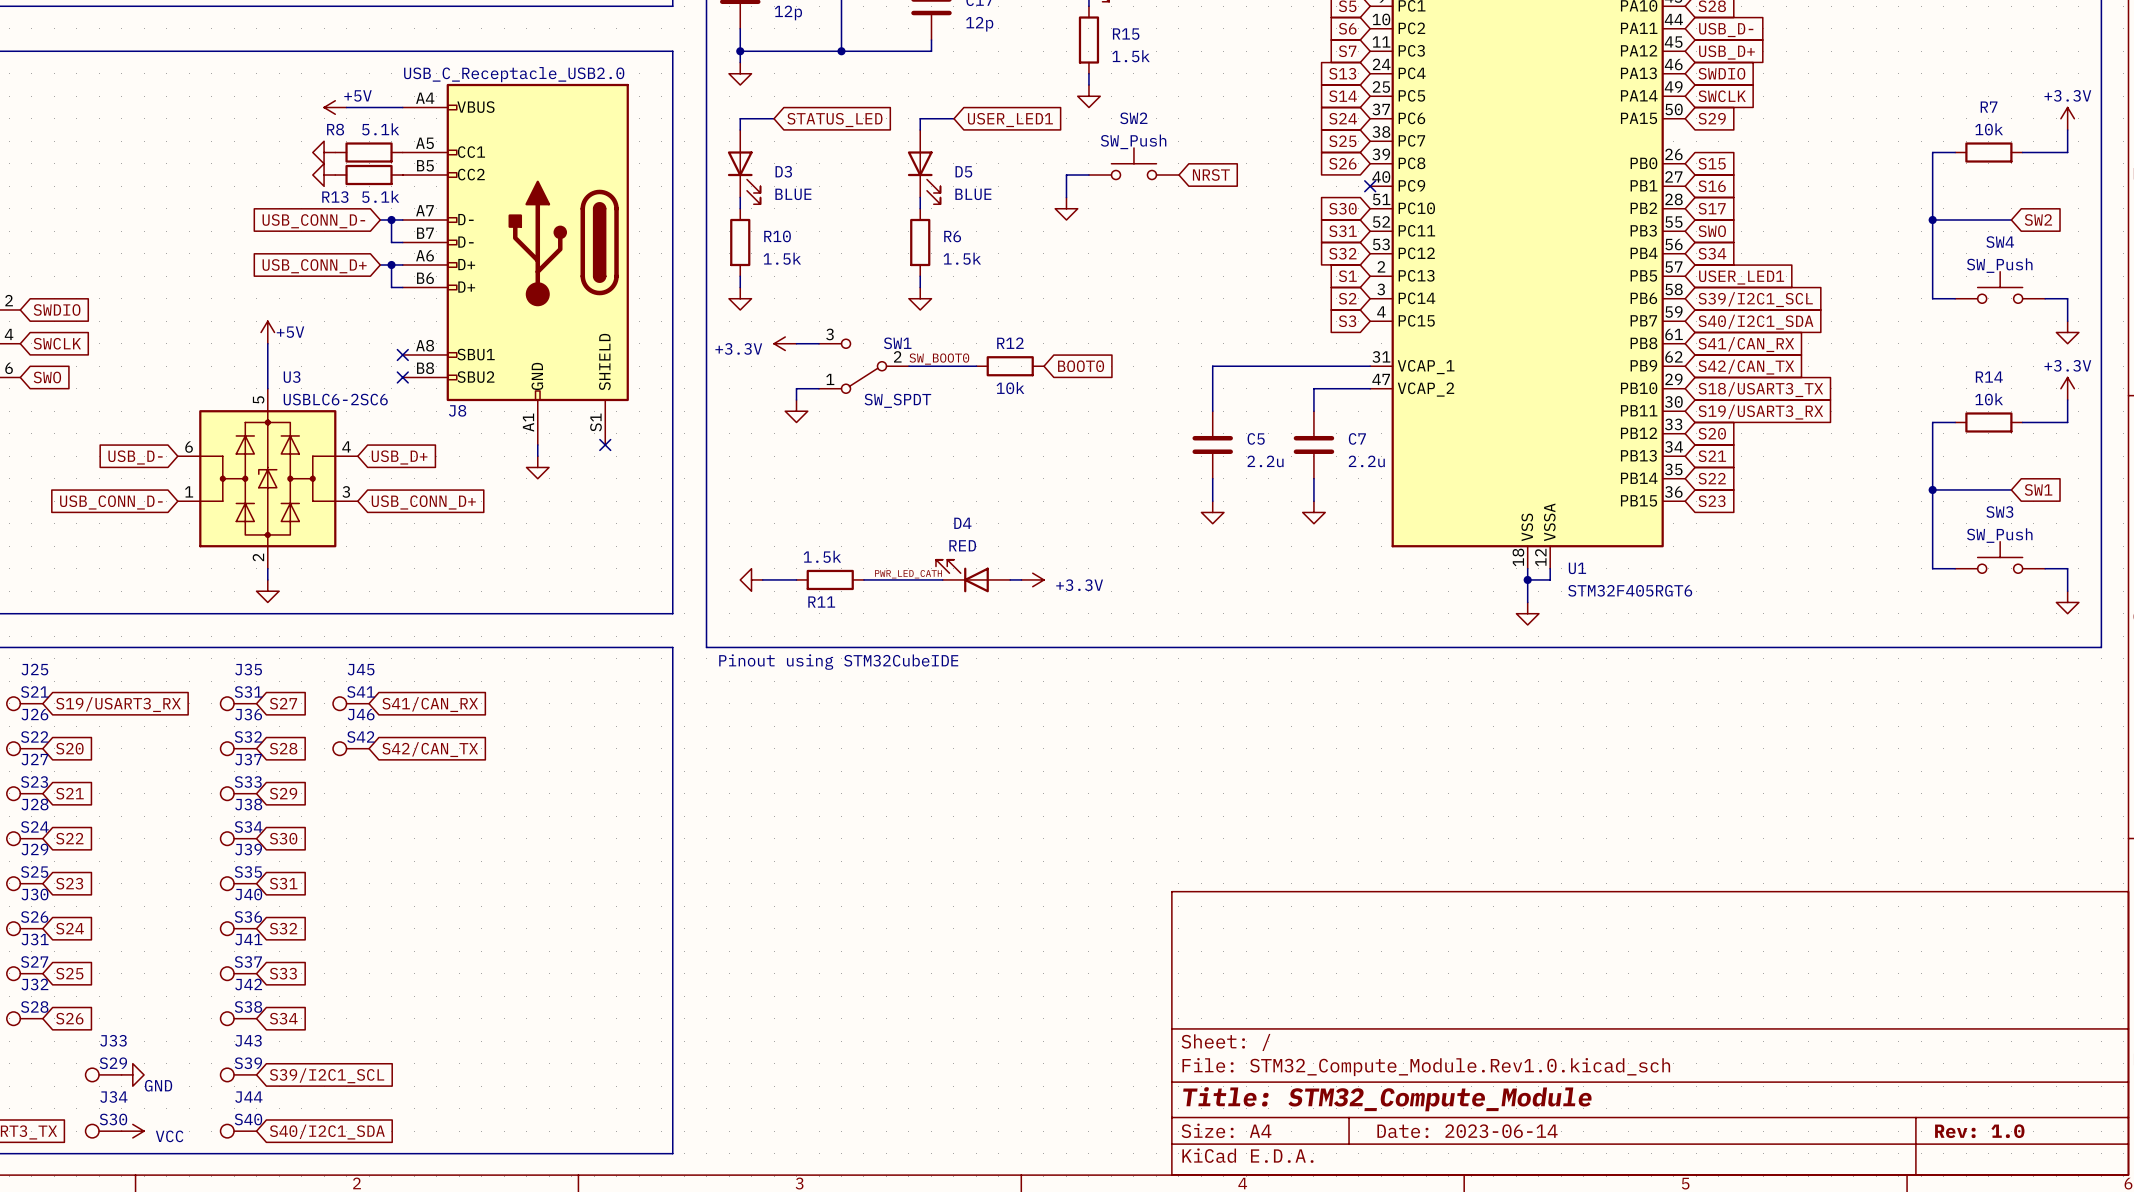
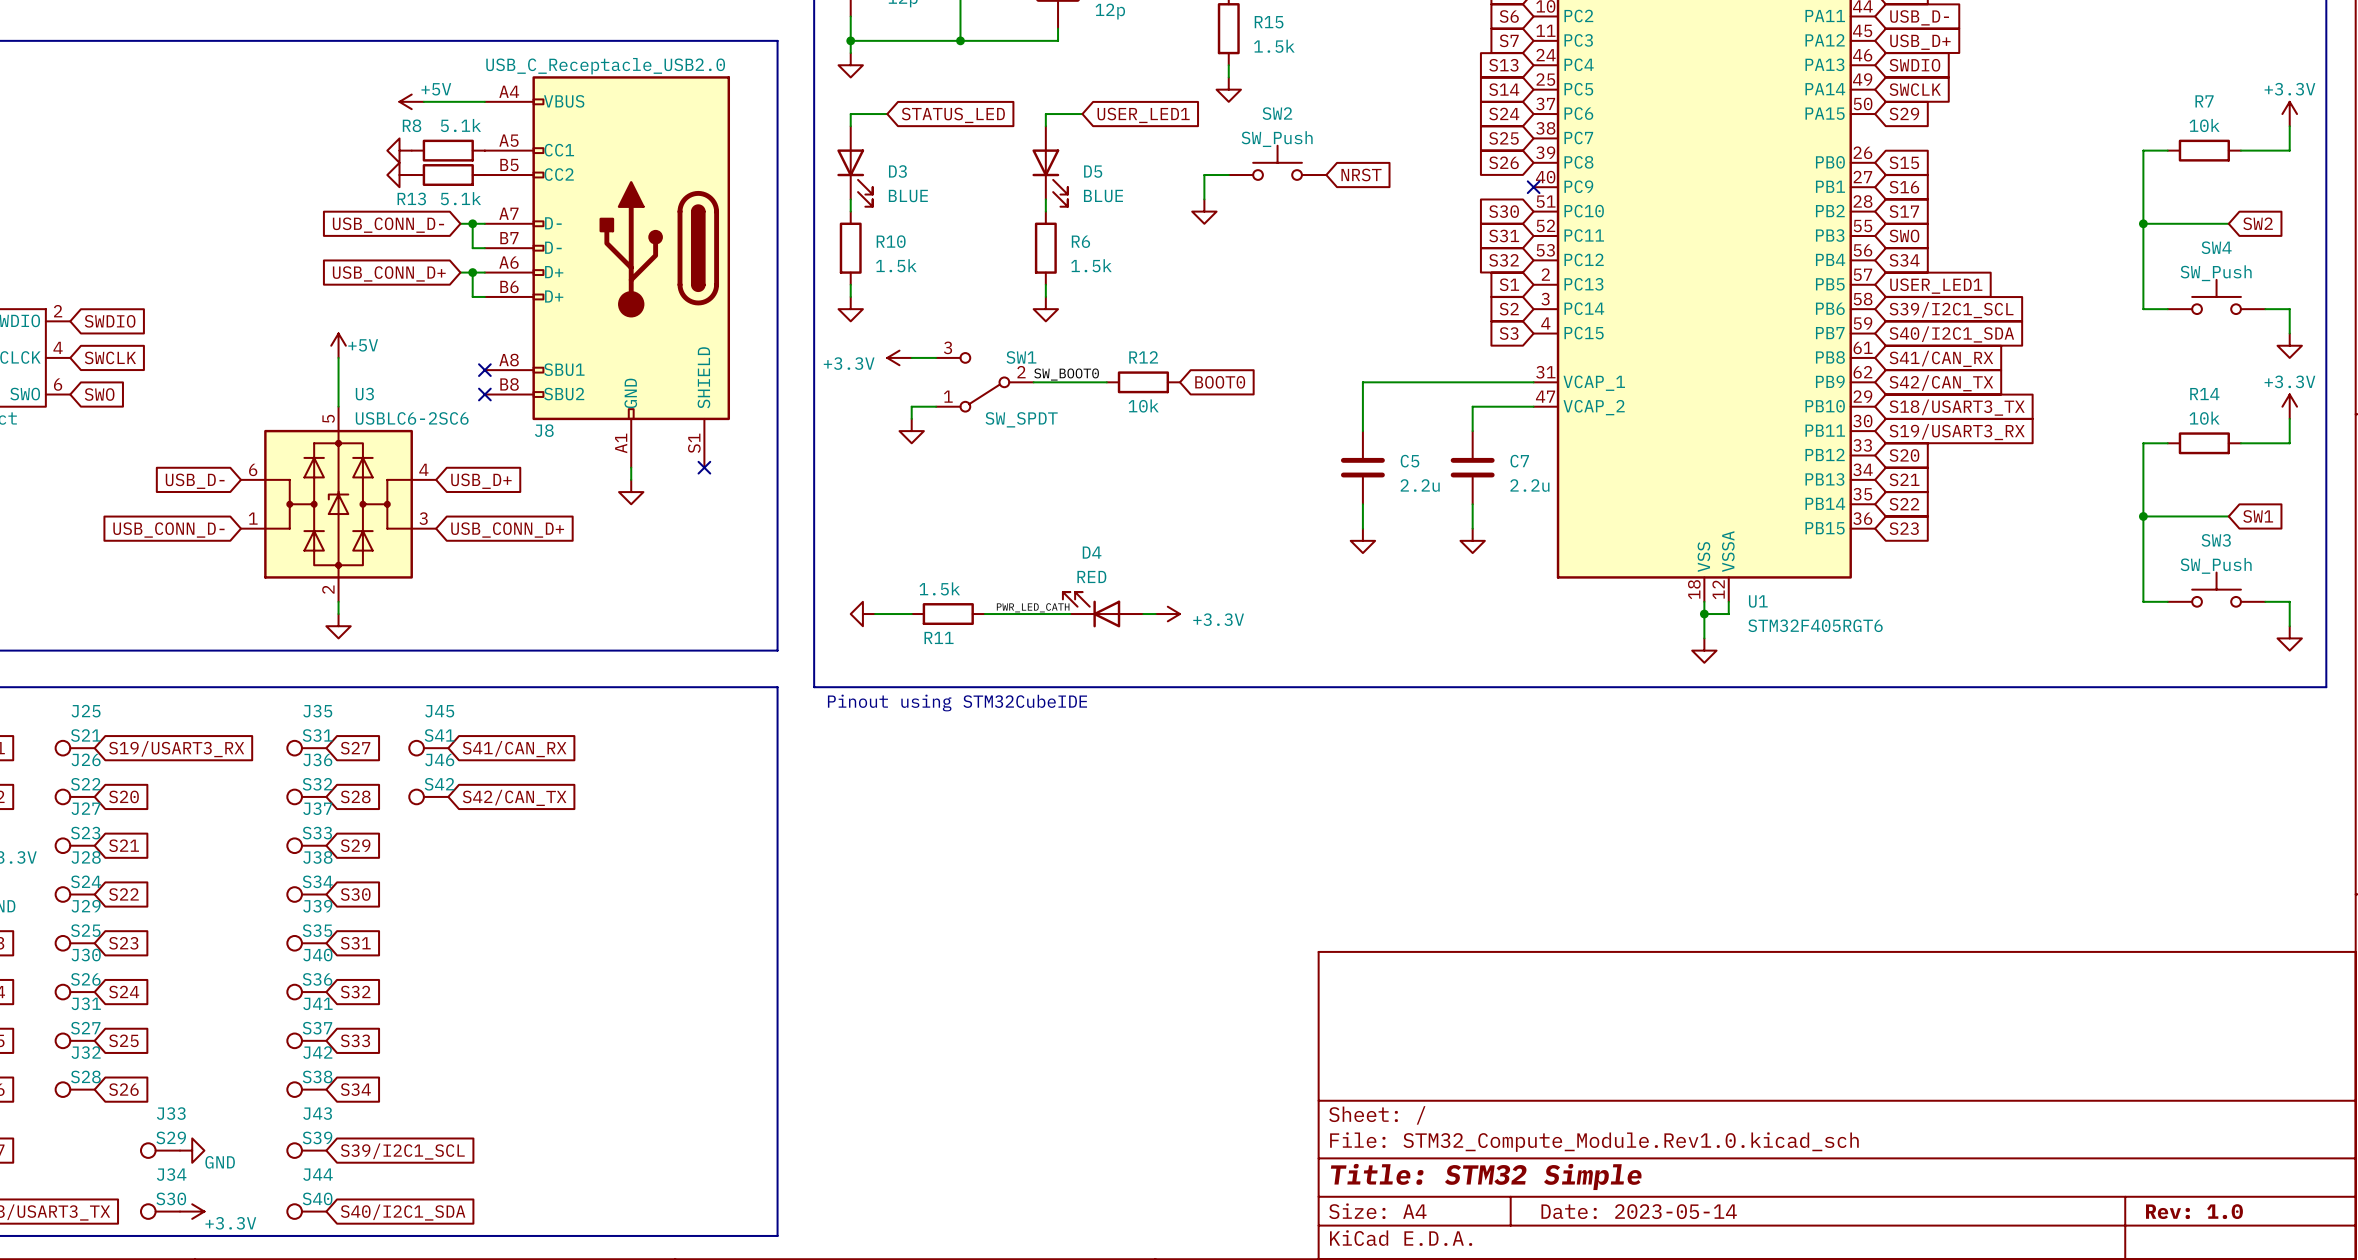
title block: Title: STM32_Compute_Module (1387, 1099) -> Title: STM32 Simple (1486, 1176)
power symbol: VCC (132, 1131) -> +3.3V (192, 1211)
title block: Date: 2023-06-14 (1467, 1131) -> Date: 2023-05-14 (1639, 1211)

